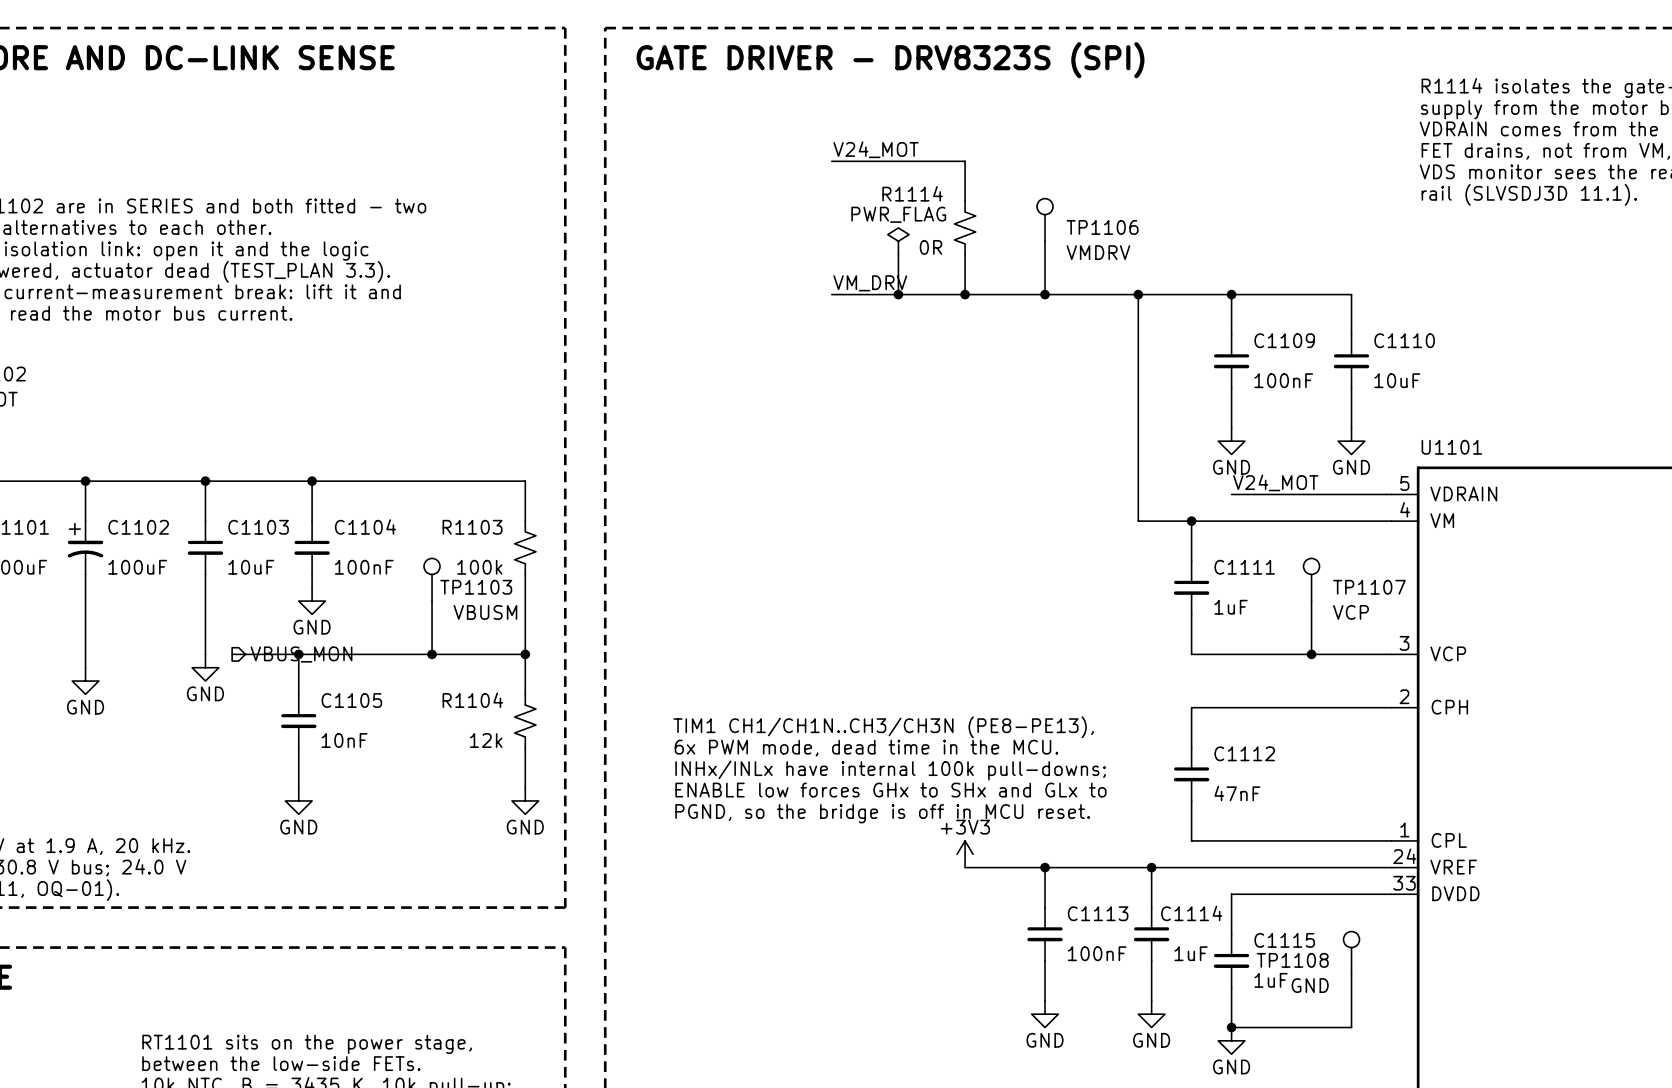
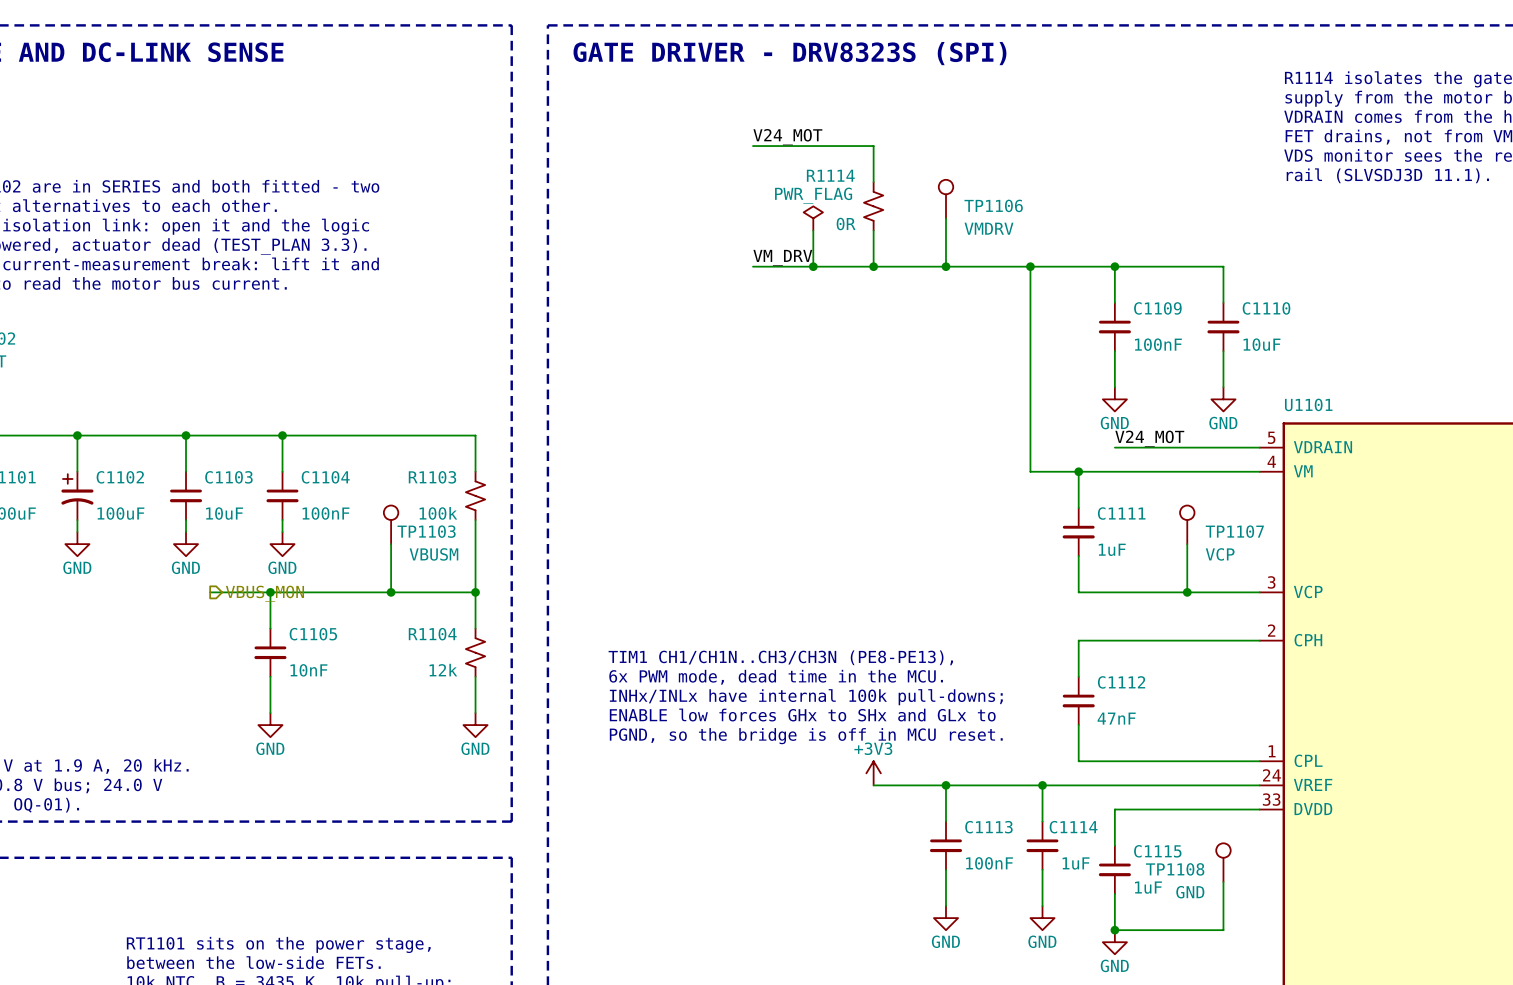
wire: (85, 587) (85, 667) -> none
wire: (205, 587) (205, 654) -> none
power symbol: none -> GND (77, 544)
power symbol position: GND (205, 667) -> GND (186, 544)
power symbol: GND (85, 681) -> none

